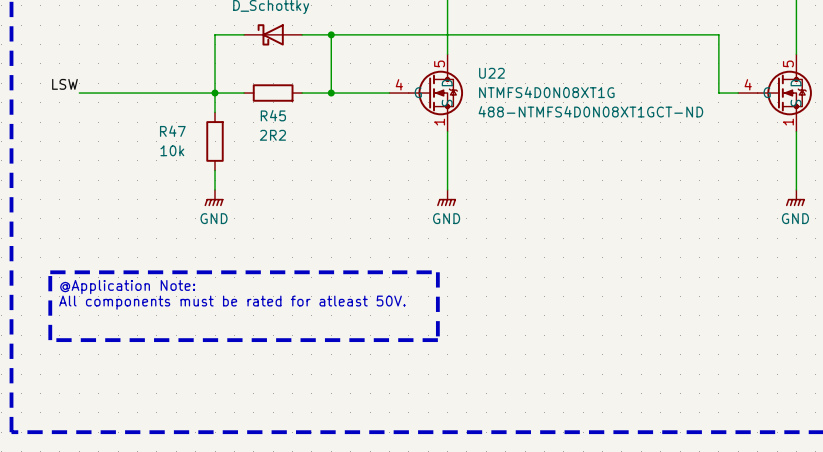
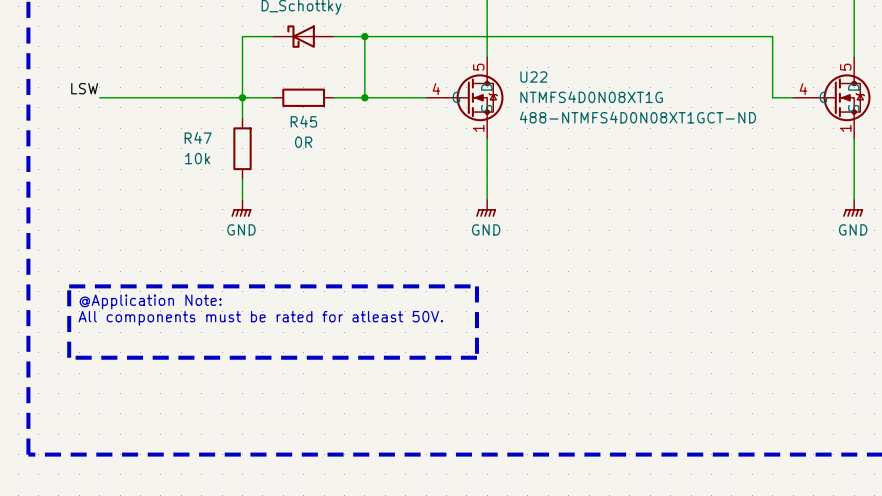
R45 value: 2R2 (272, 135) -> 0R (303, 142)

